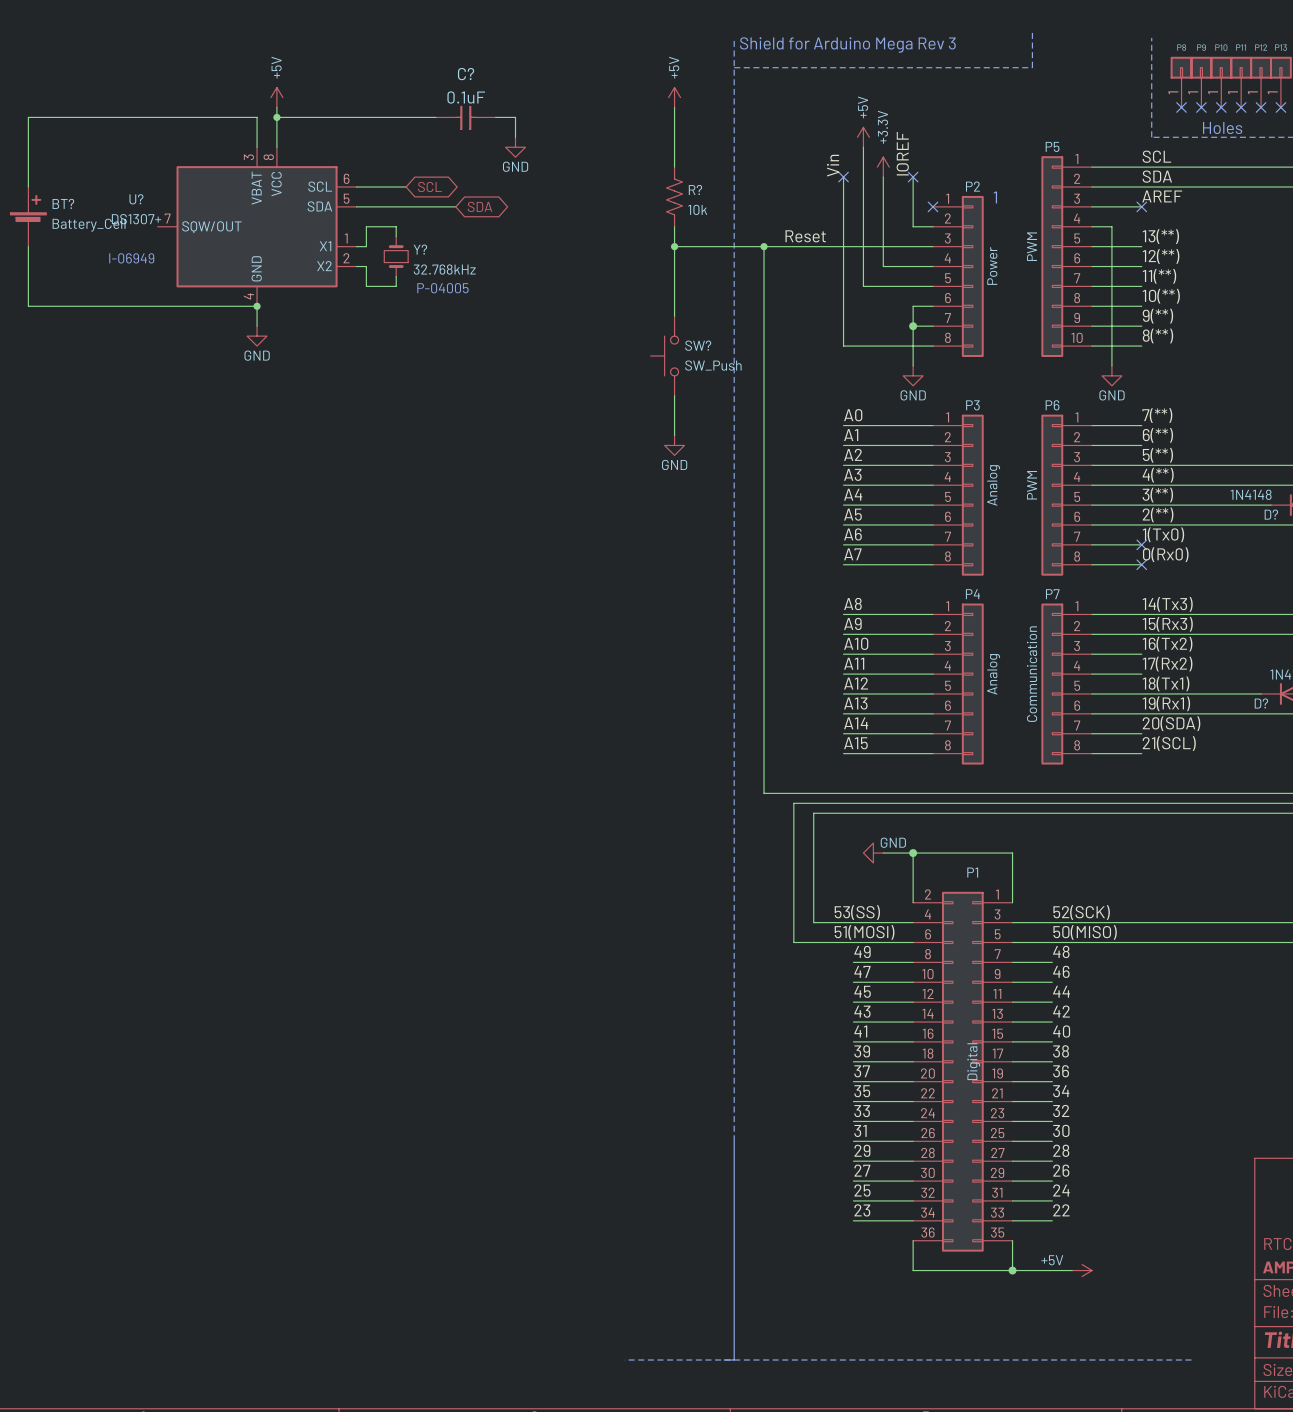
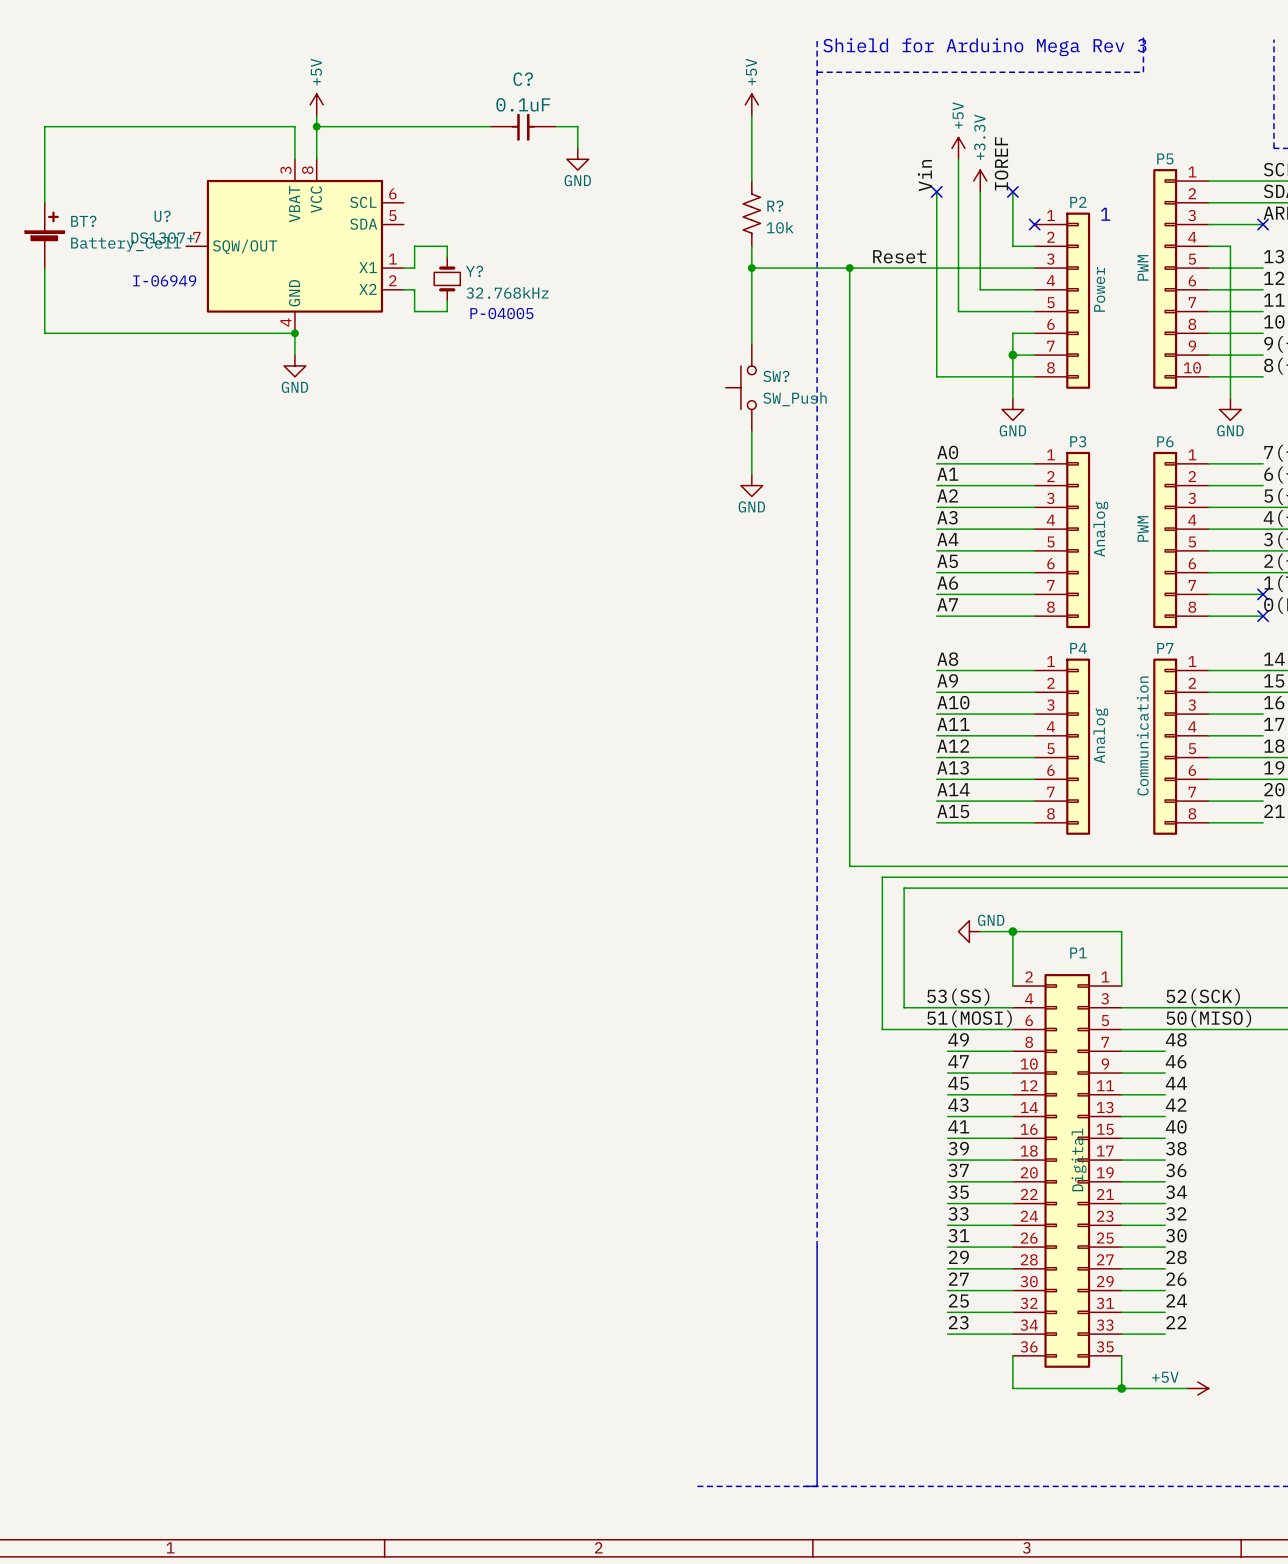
wire: (356, 187) (406, 187) -> none
global label: SCL (429, 187) -> none
wire: (356, 206) (455, 206) -> none
global label: SDA (480, 206) -> none

